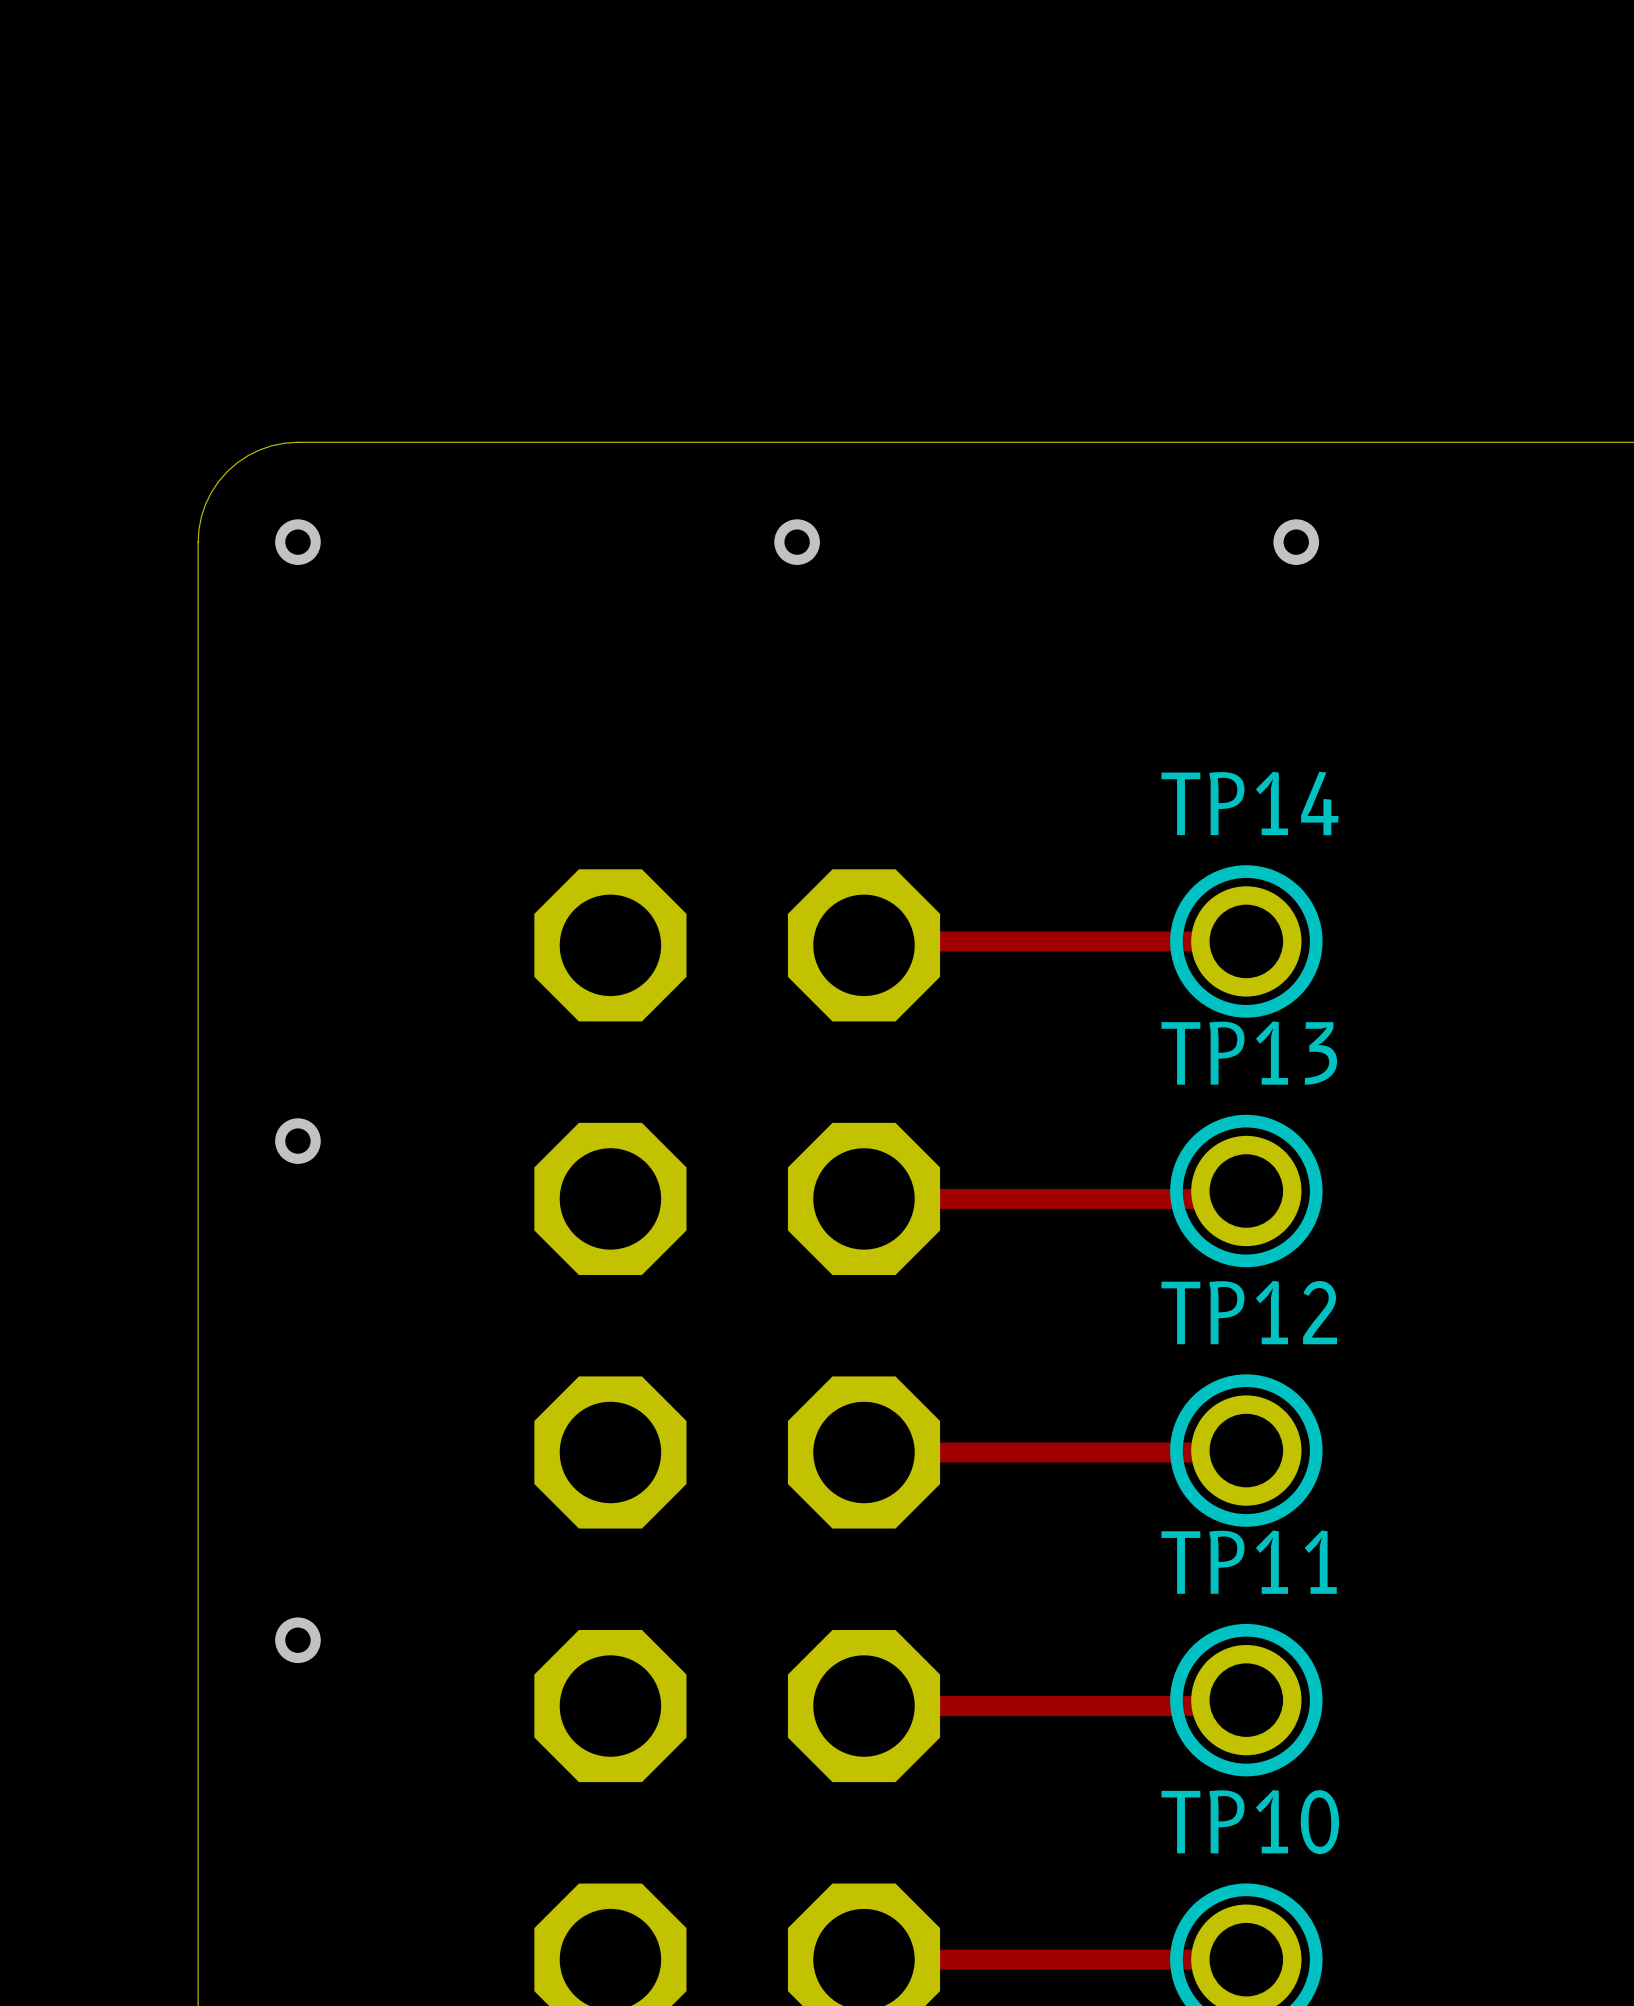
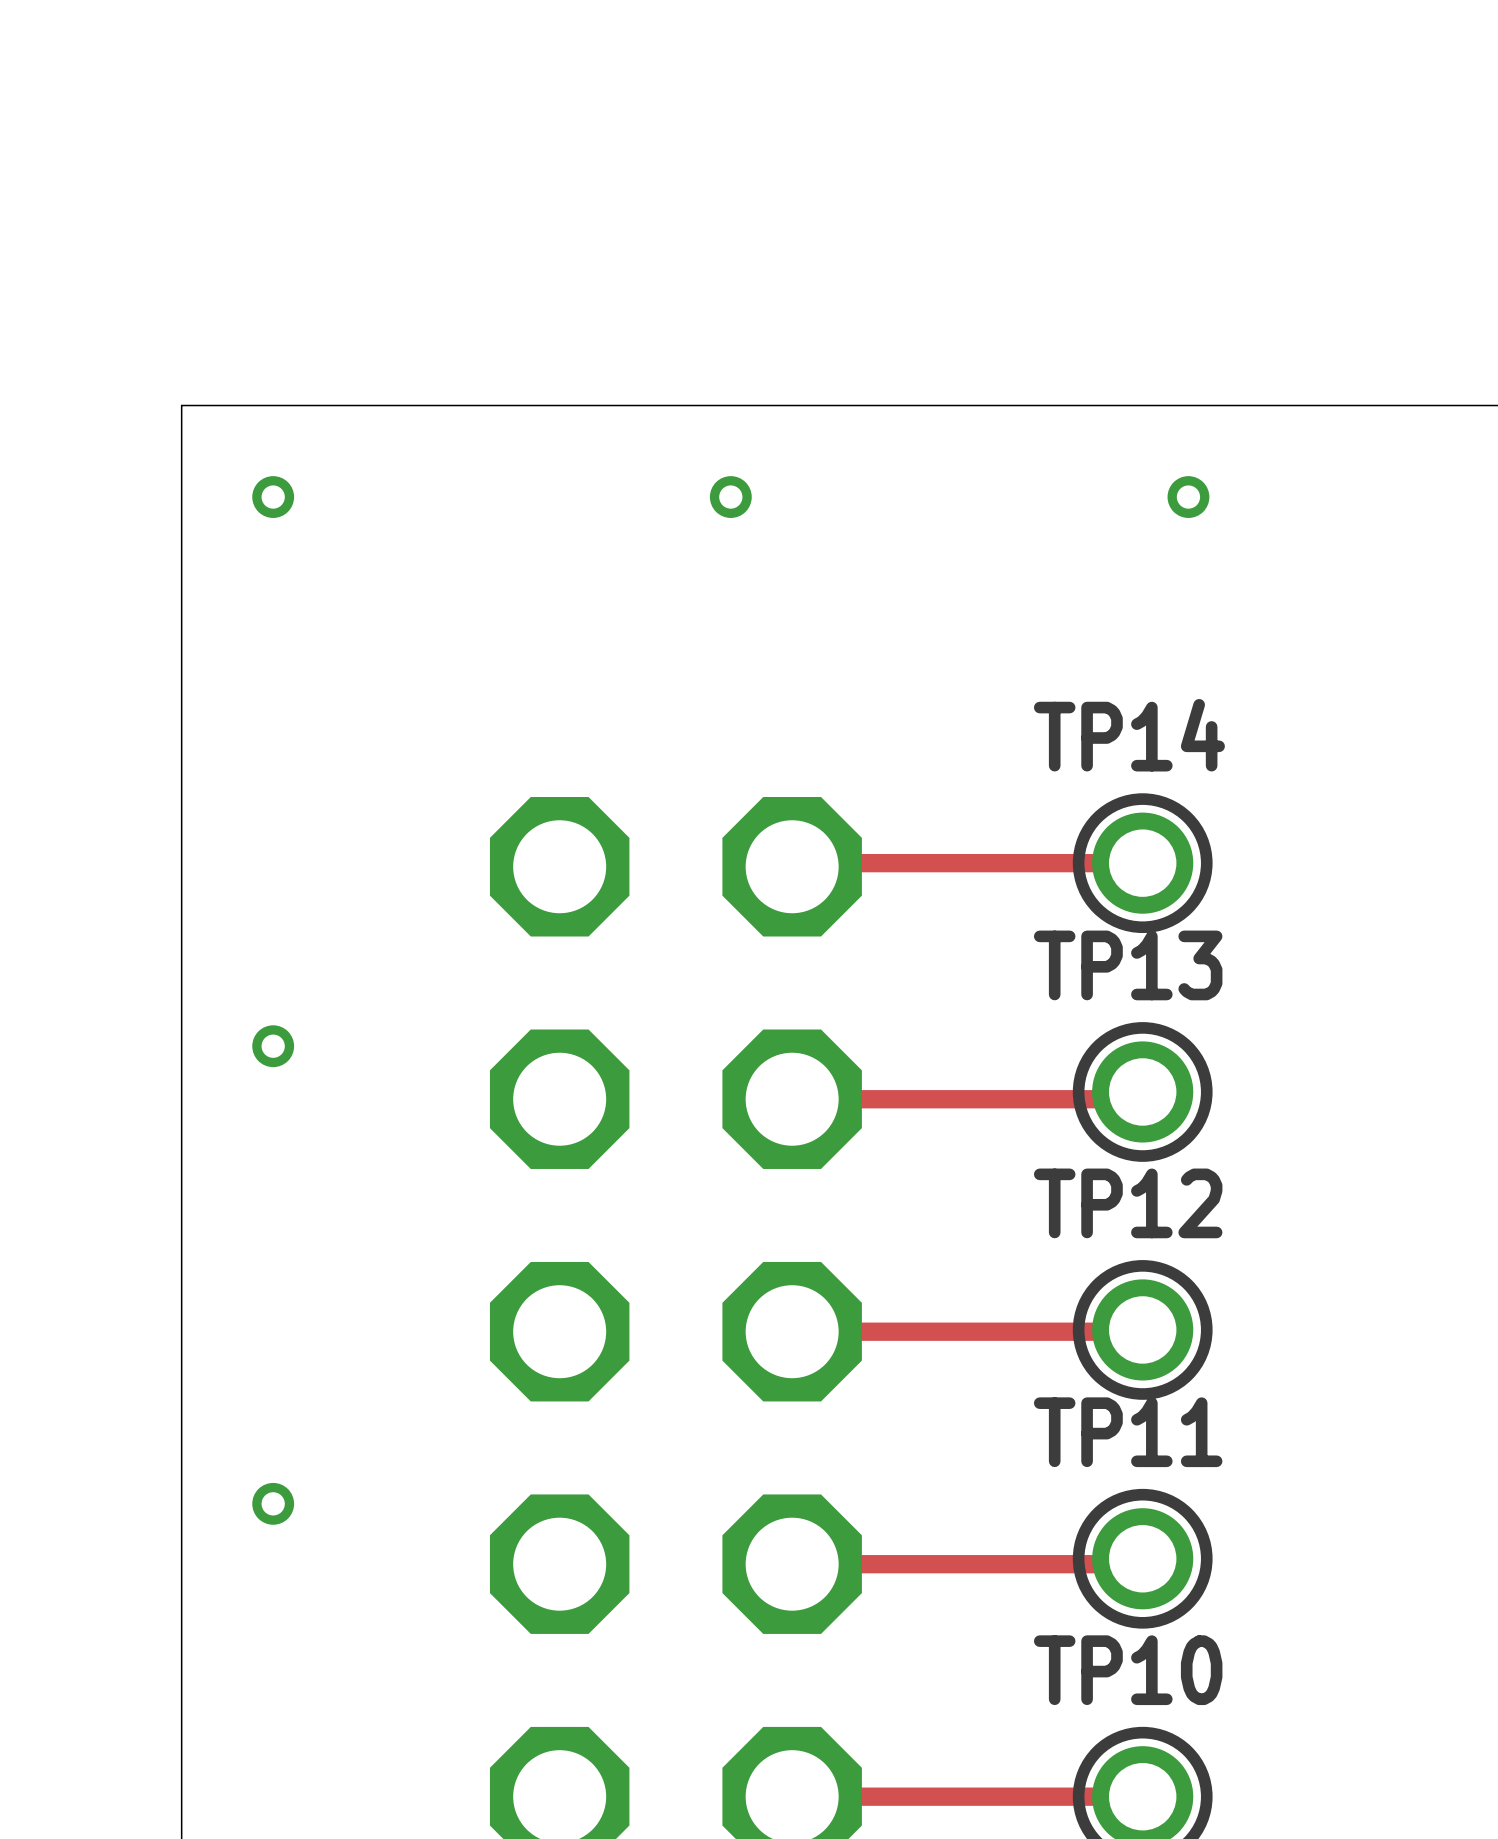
board edge: (297, 442) (272, 445) (259, 449) (237, 462) (227, 471) (218, 481) (205, 503) (201, 516) (198, 542) -> (273, 405) (181, 405) (181, 497)

